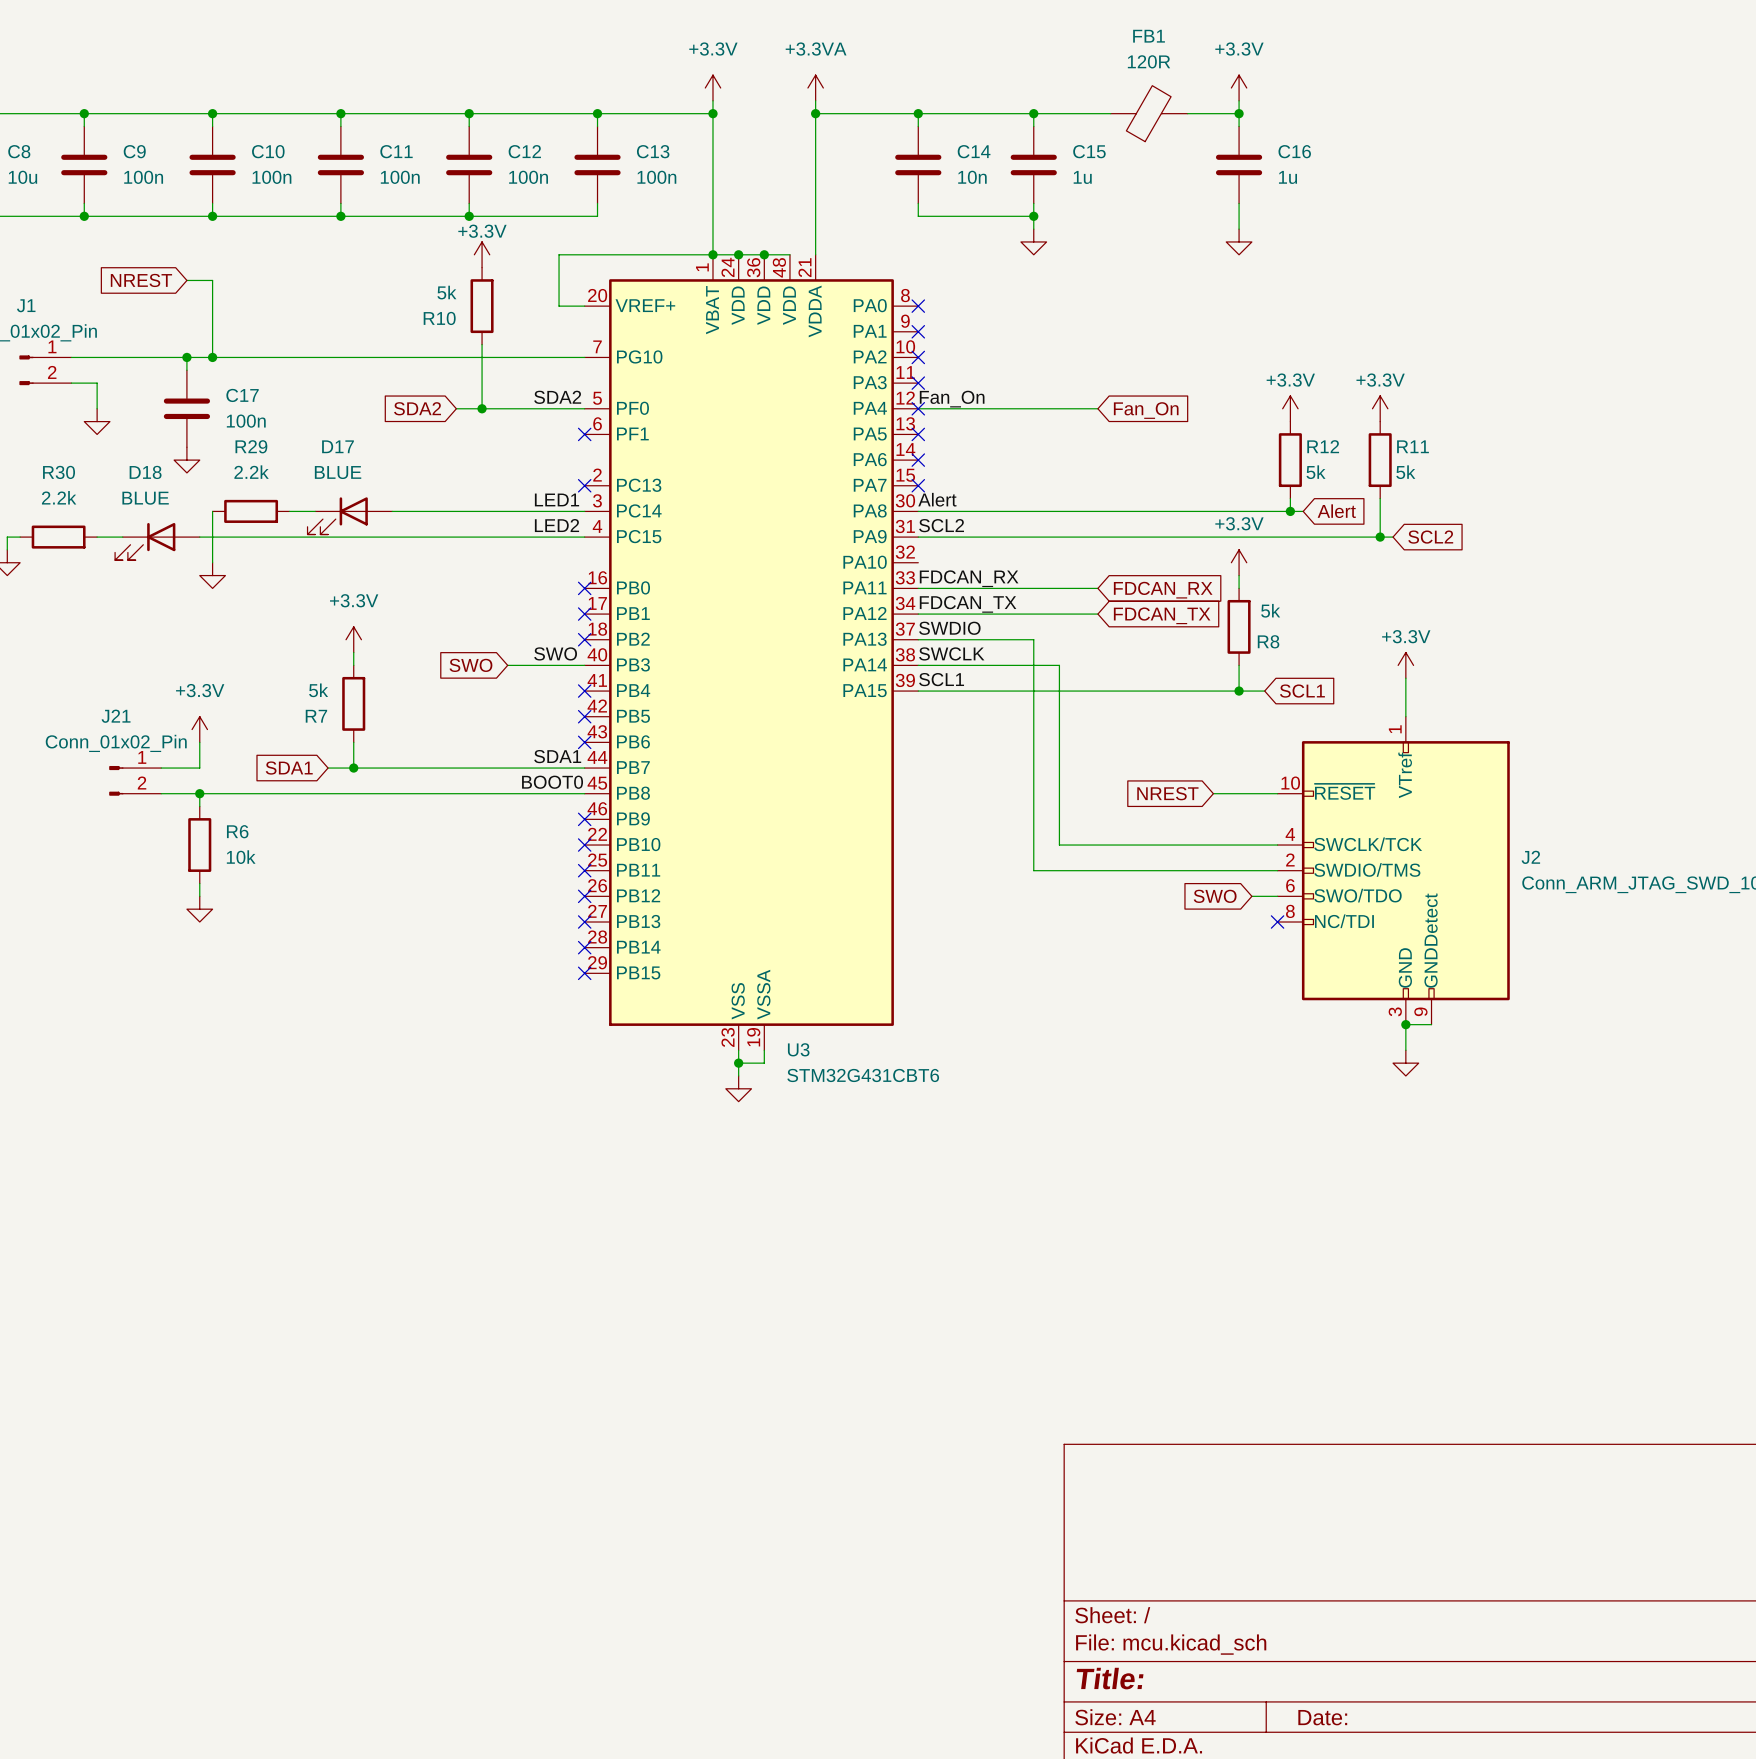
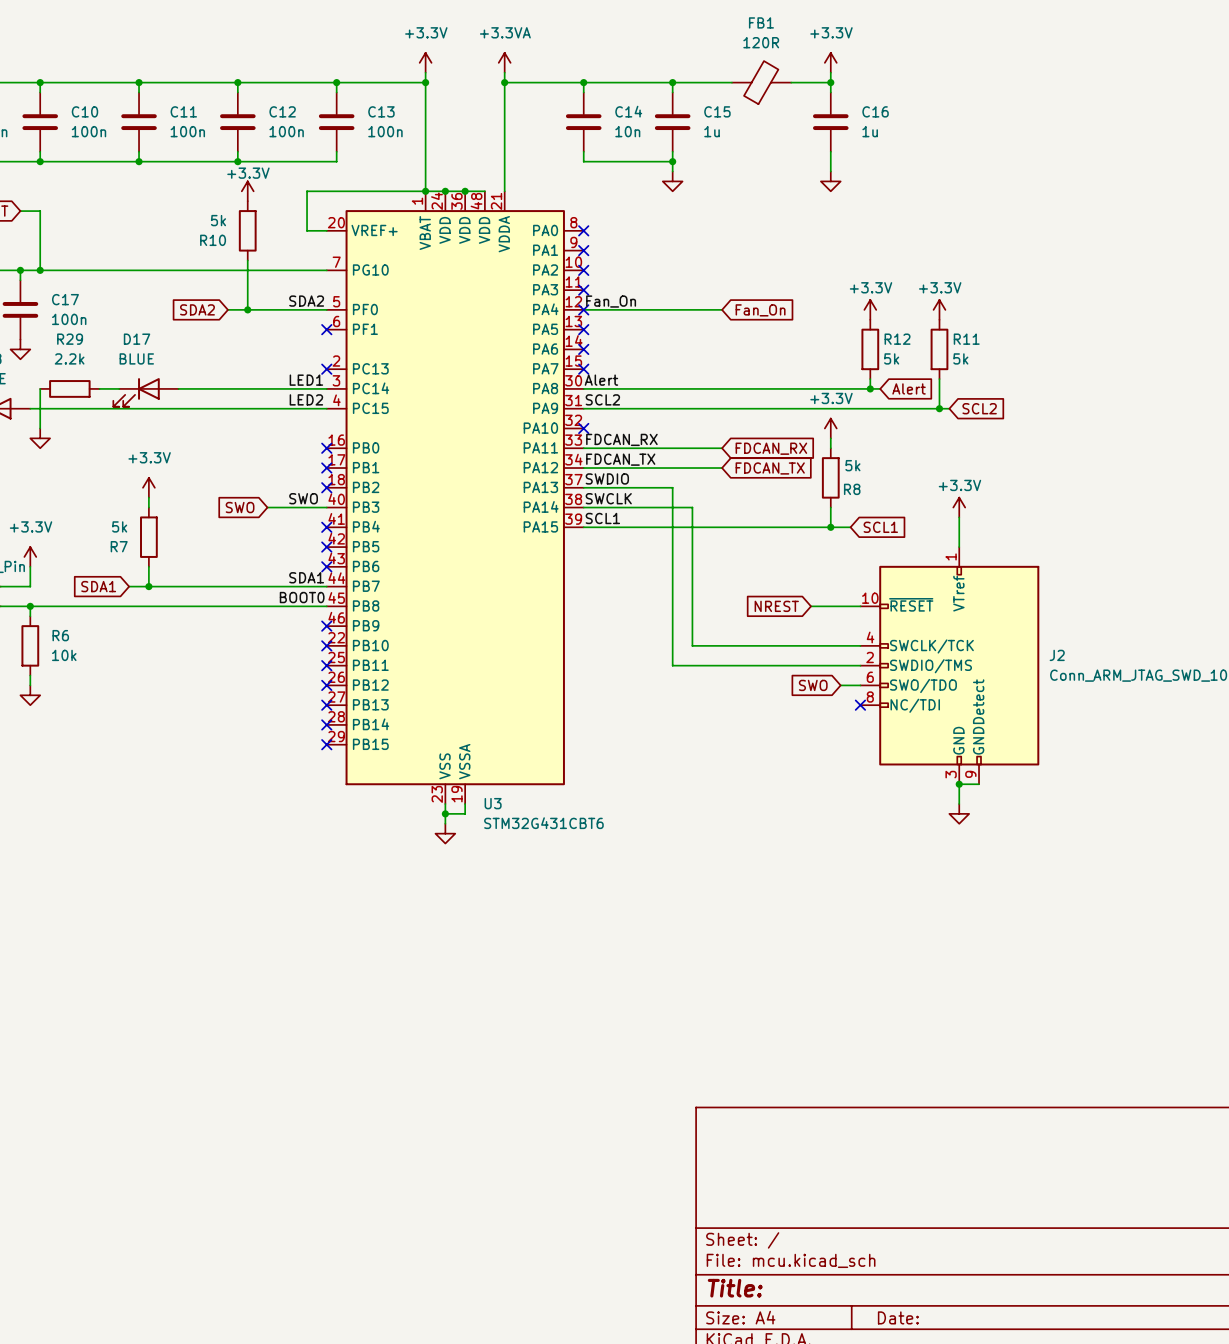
no-connect mark: none -> (583, 428)

